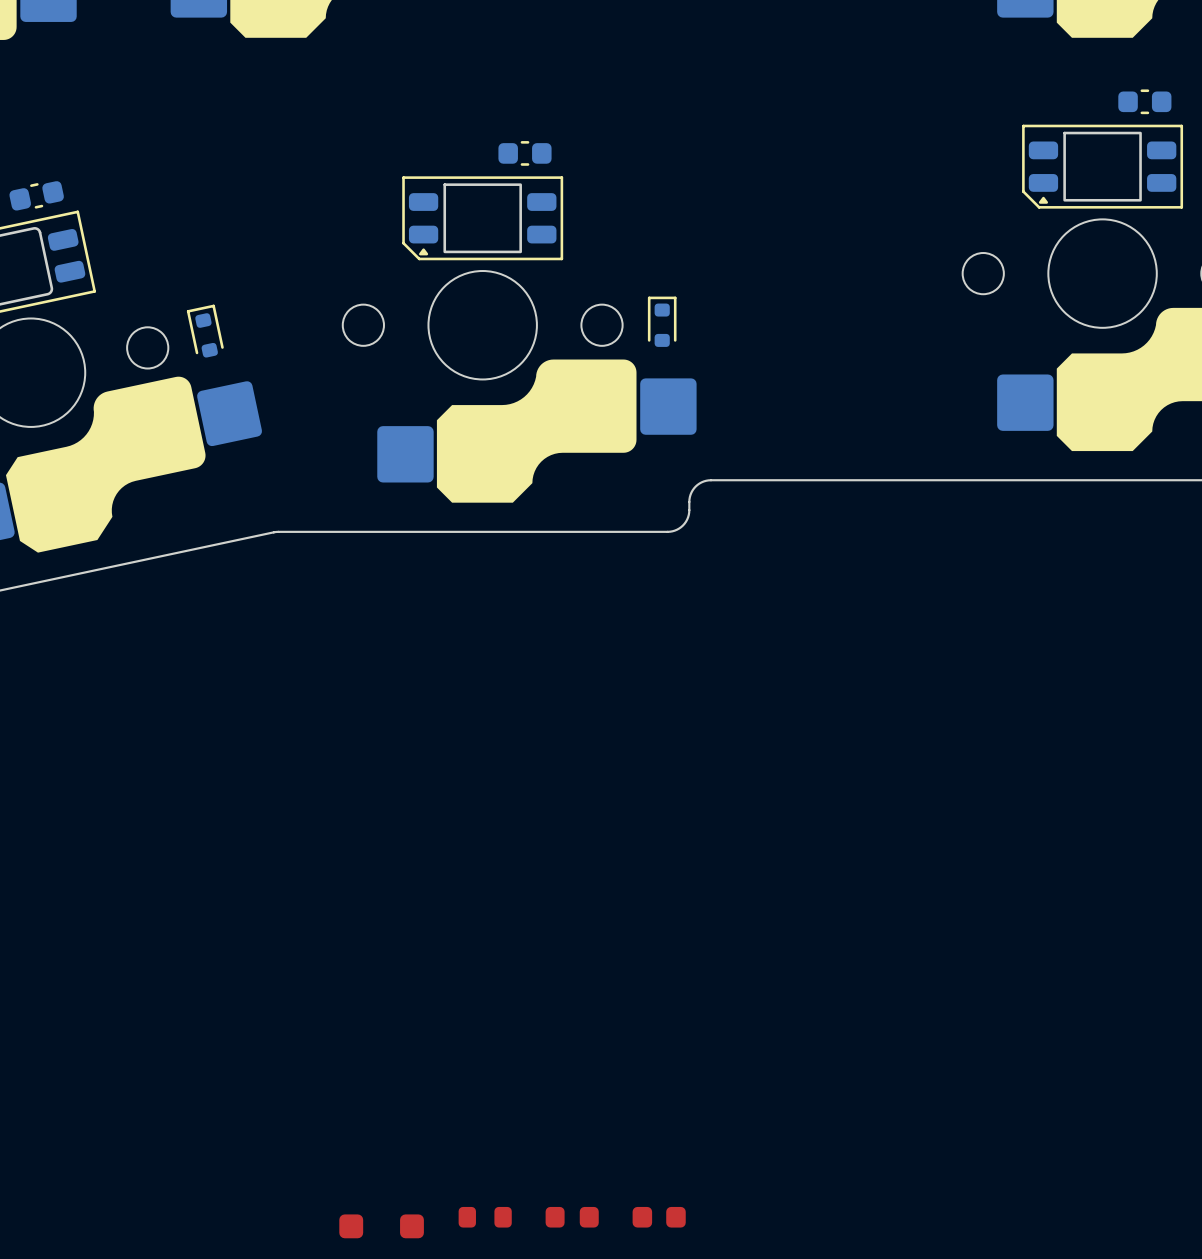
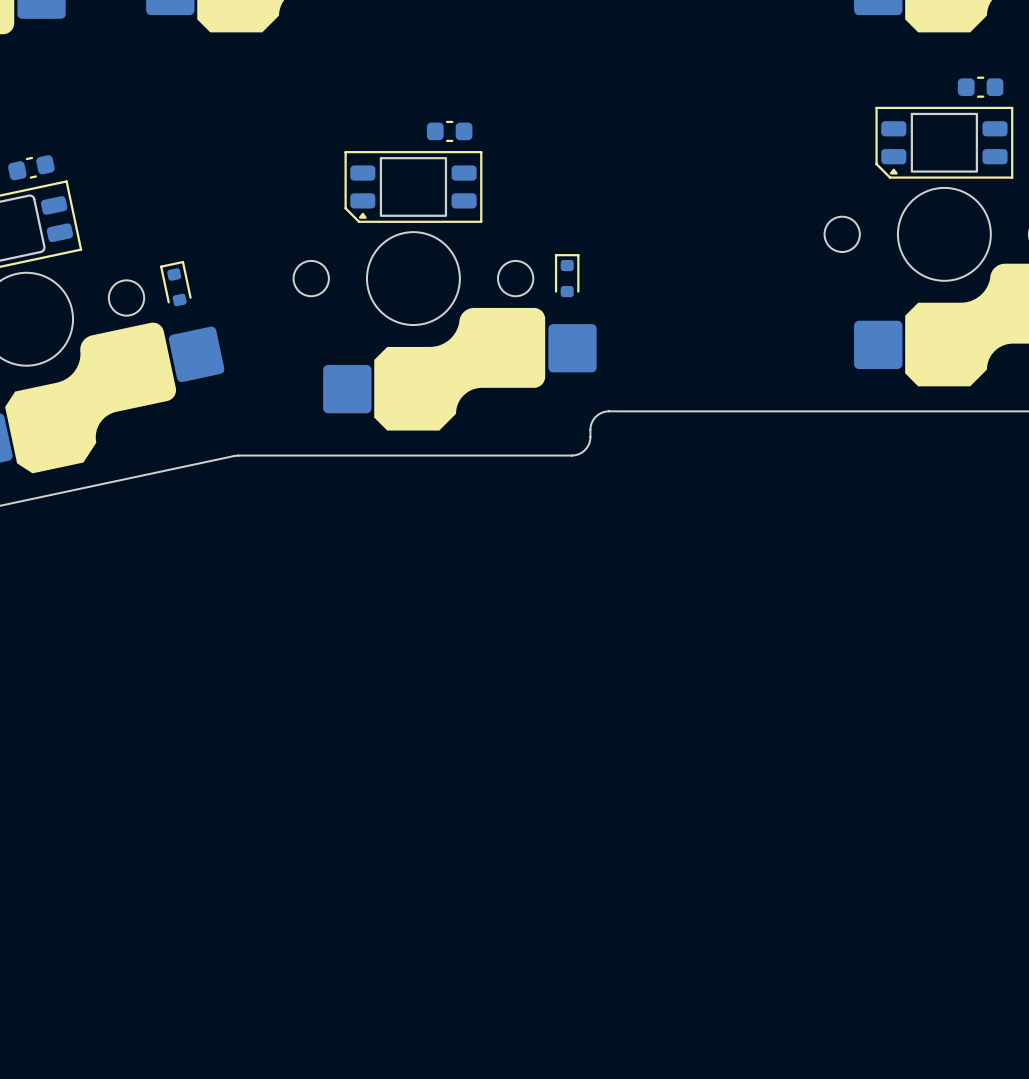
part: (485, 1217) -> none
part: (572, 1217) -> none
part: (659, 1217) -> none
part: (381, 1226) -> none

